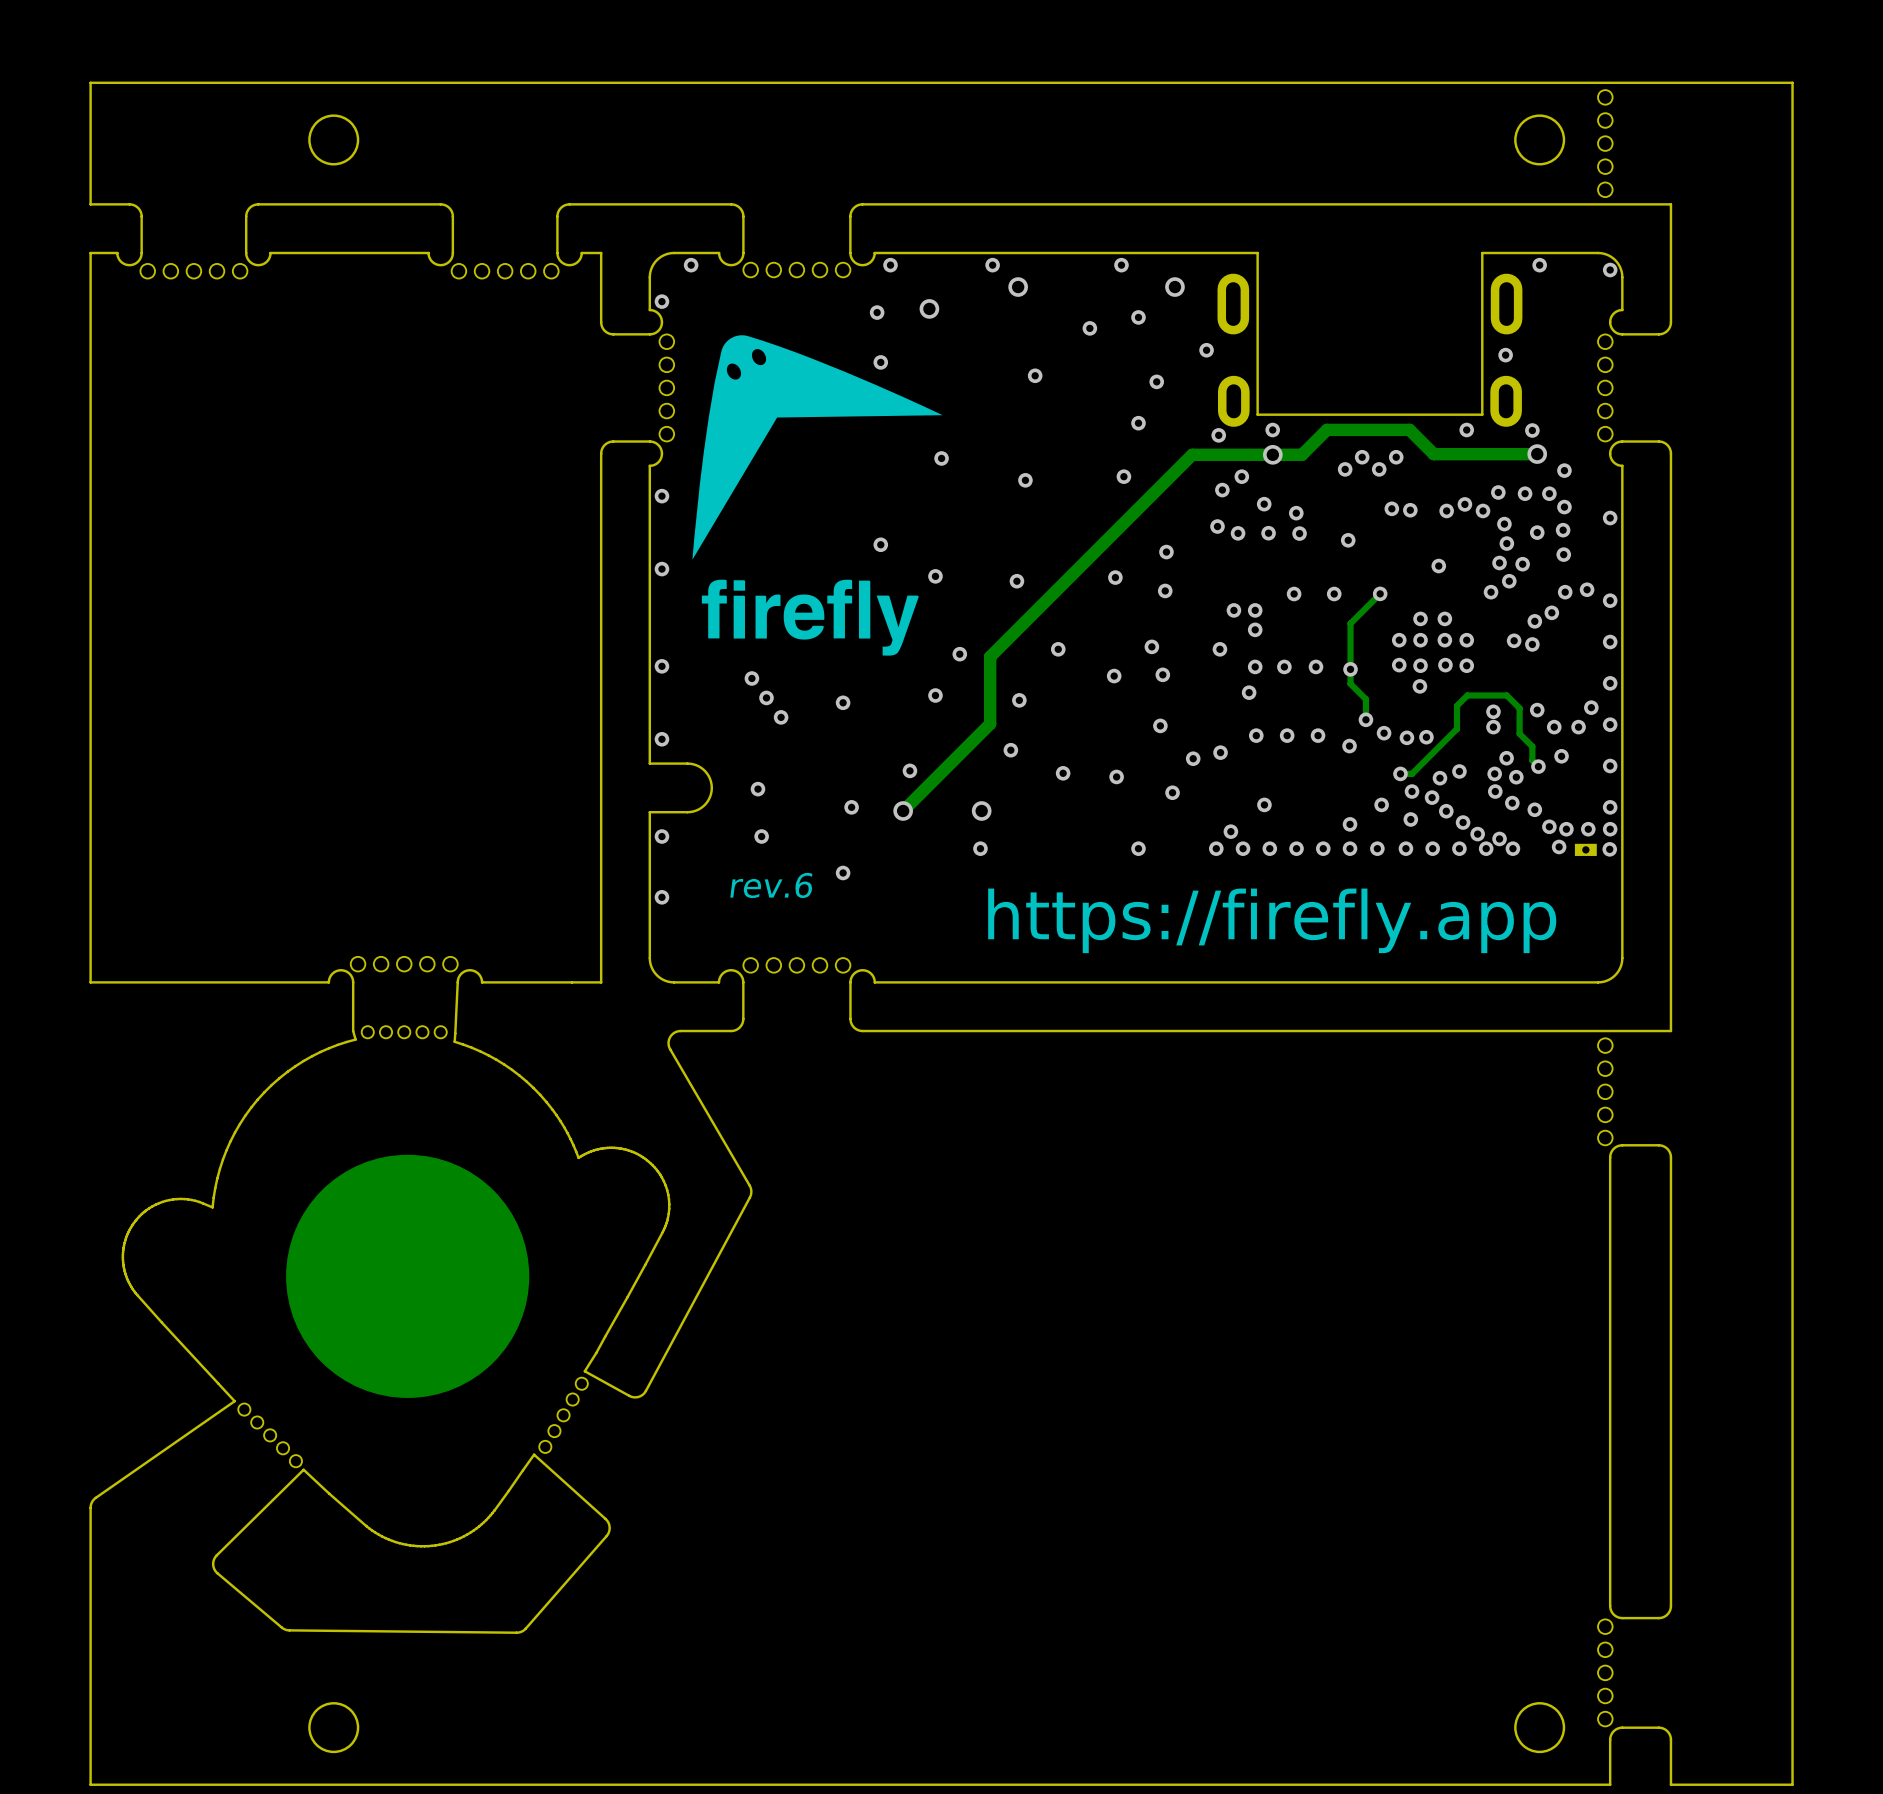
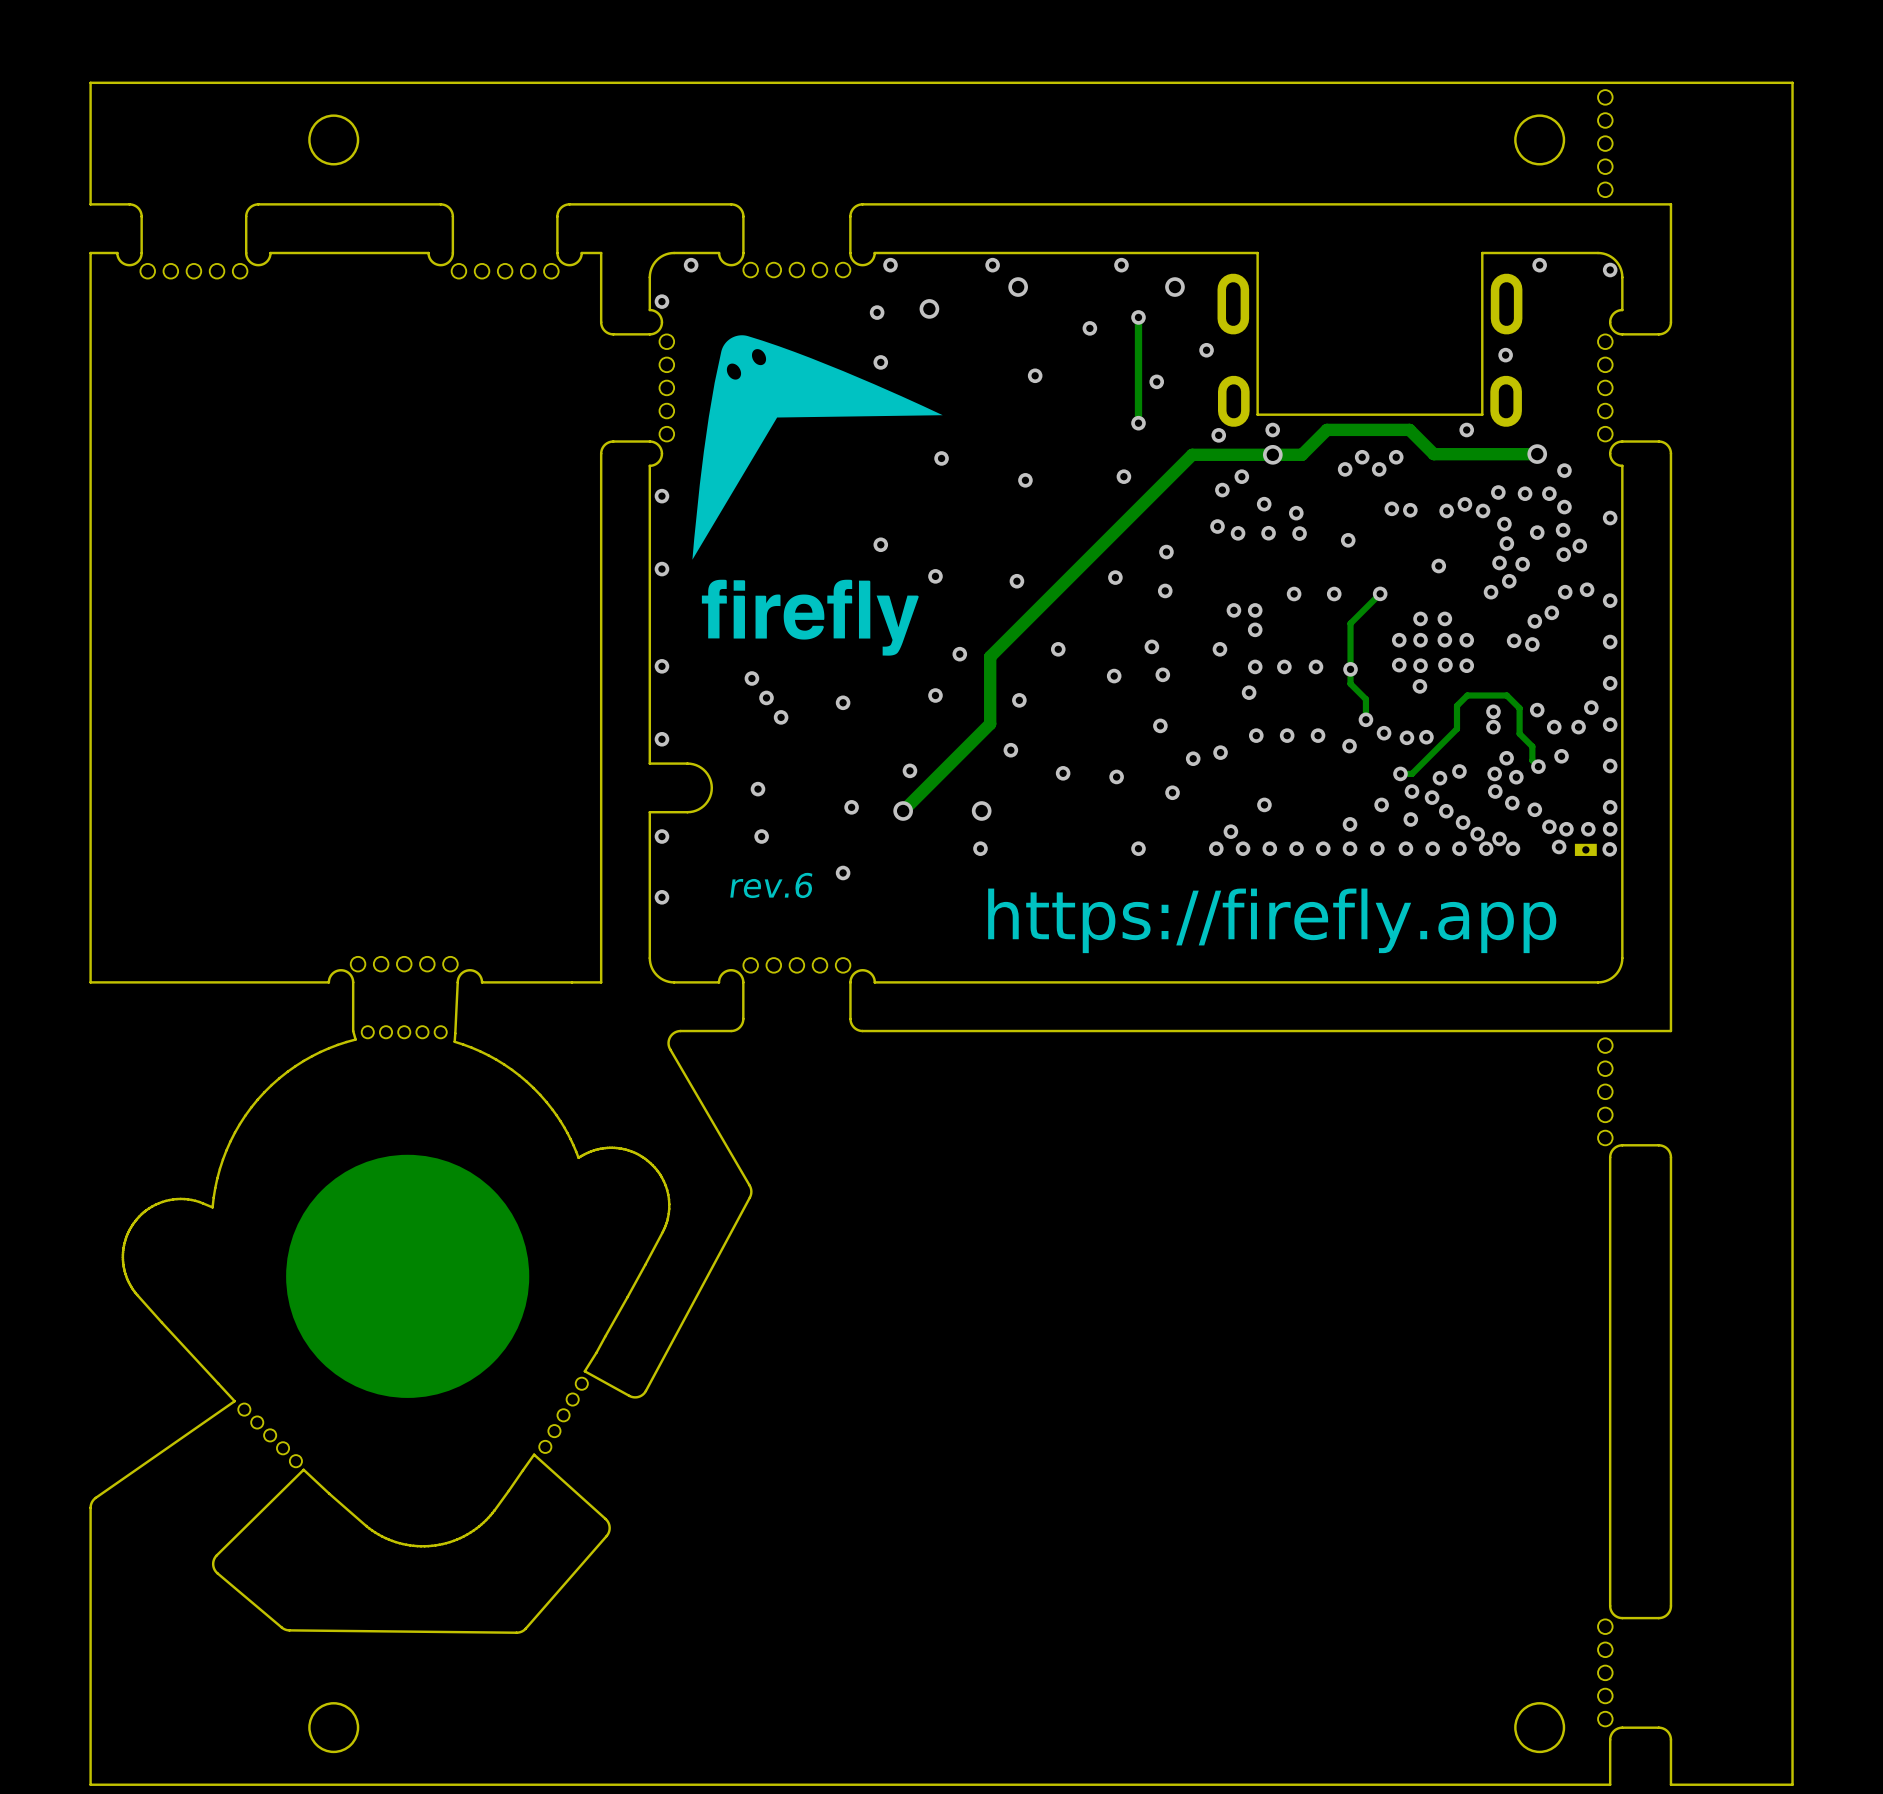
track: none -> (1138, 317) (1138, 423)
via position: (1532, 430) -> (1579, 545)

